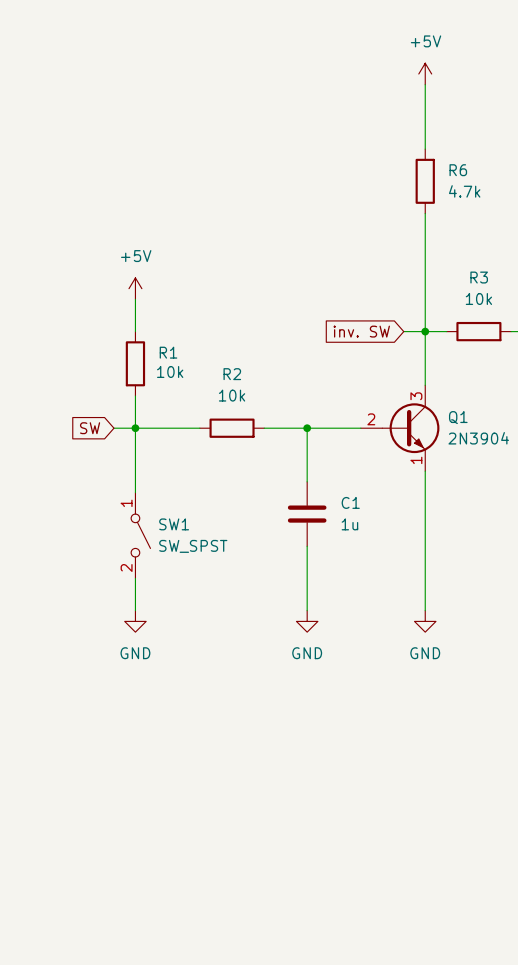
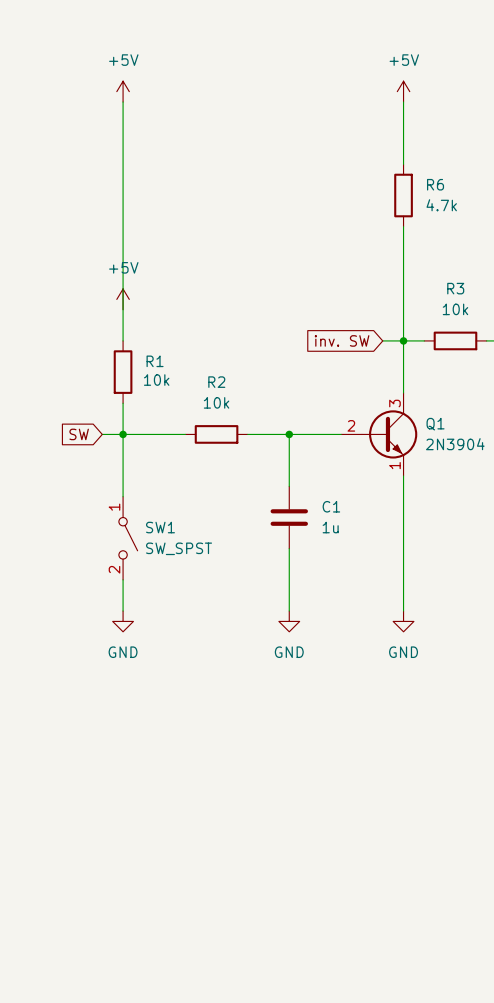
power symbol: none -> +5V (123, 91)
wire: none -> (123, 102) (123, 309)

